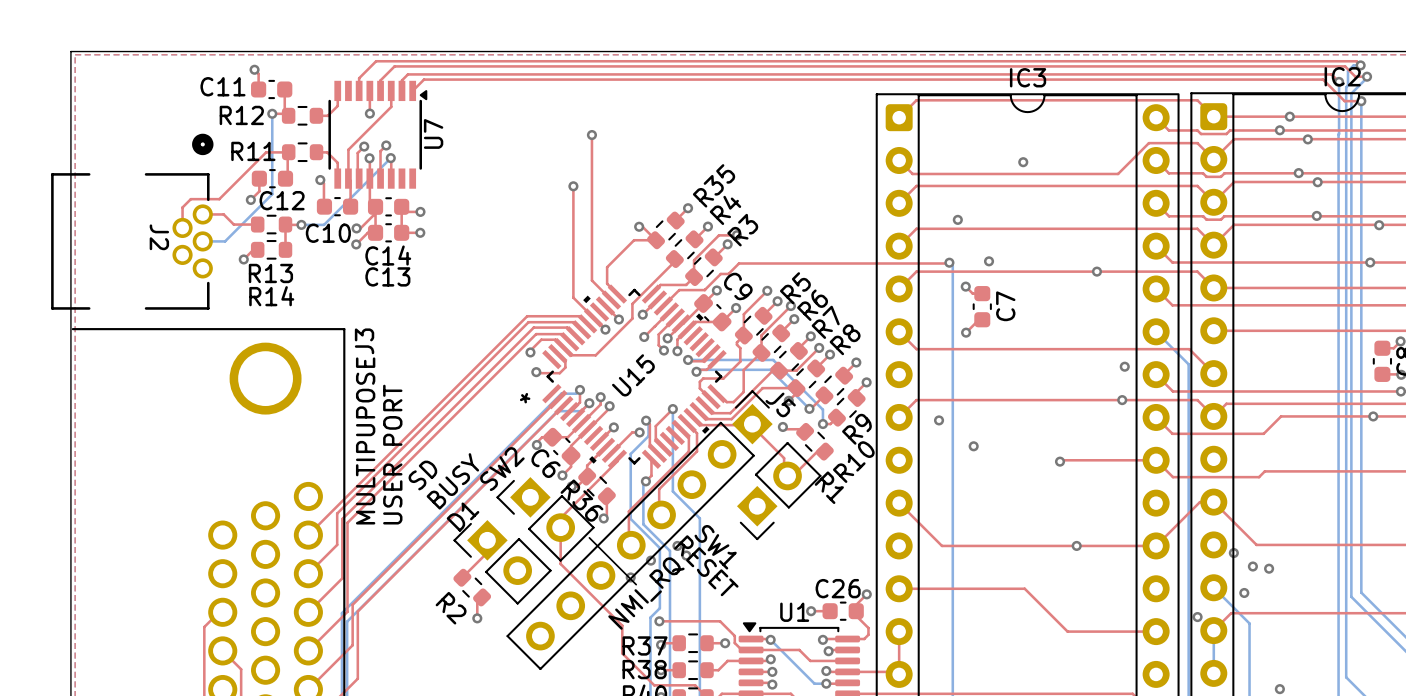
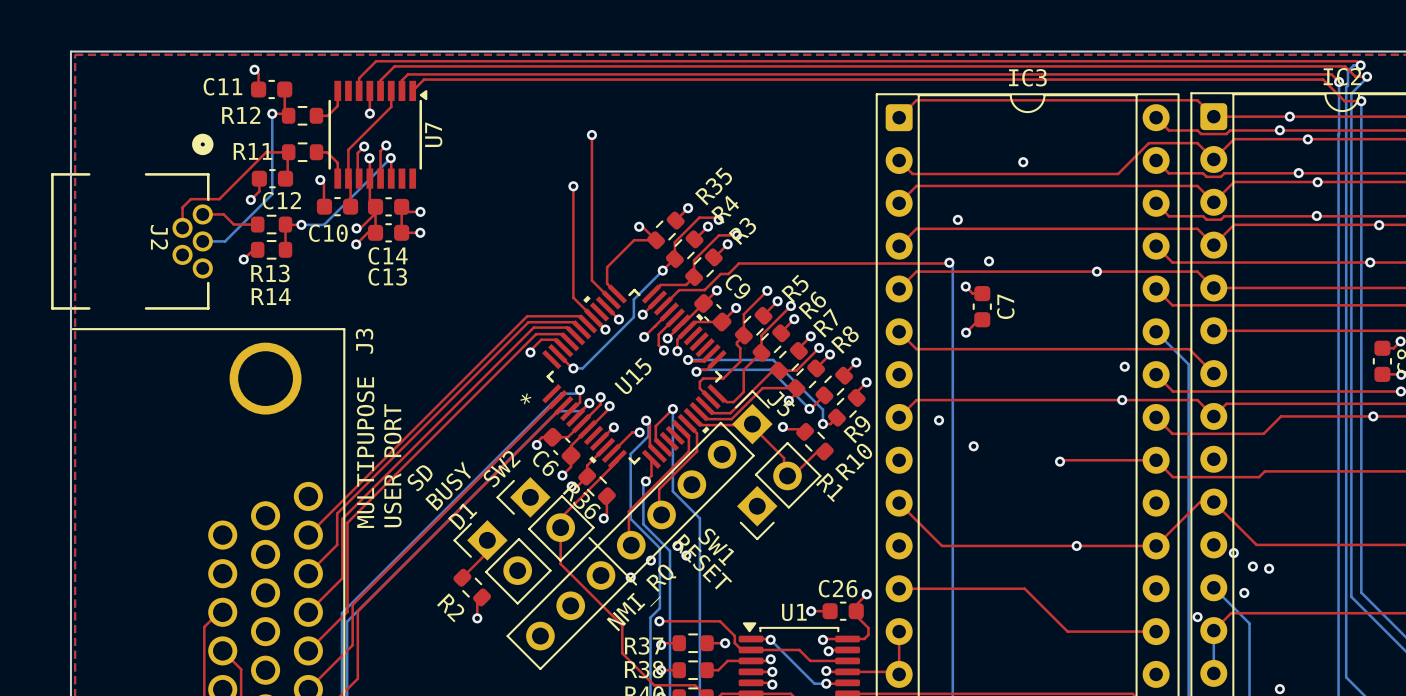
top track: none -> (718, 219) (716, 217) (699, 217) (674, 242) (674, 259) (662, 270)
via: none -> (718, 219)
top track: (674, 264) (672, 264) (632, 303) (632, 318) (595, 355) (571, 355) (563, 347) -> none
bottom track: none -> (662, 270) (633, 299) (633, 317) (582, 368) (573, 368)
via: none -> (662, 270)
top track: (565, 361) (565, 367) (559, 373) (536, 372) -> (565, 361) (573, 368)
via position: (536, 372) -> (573, 368)

